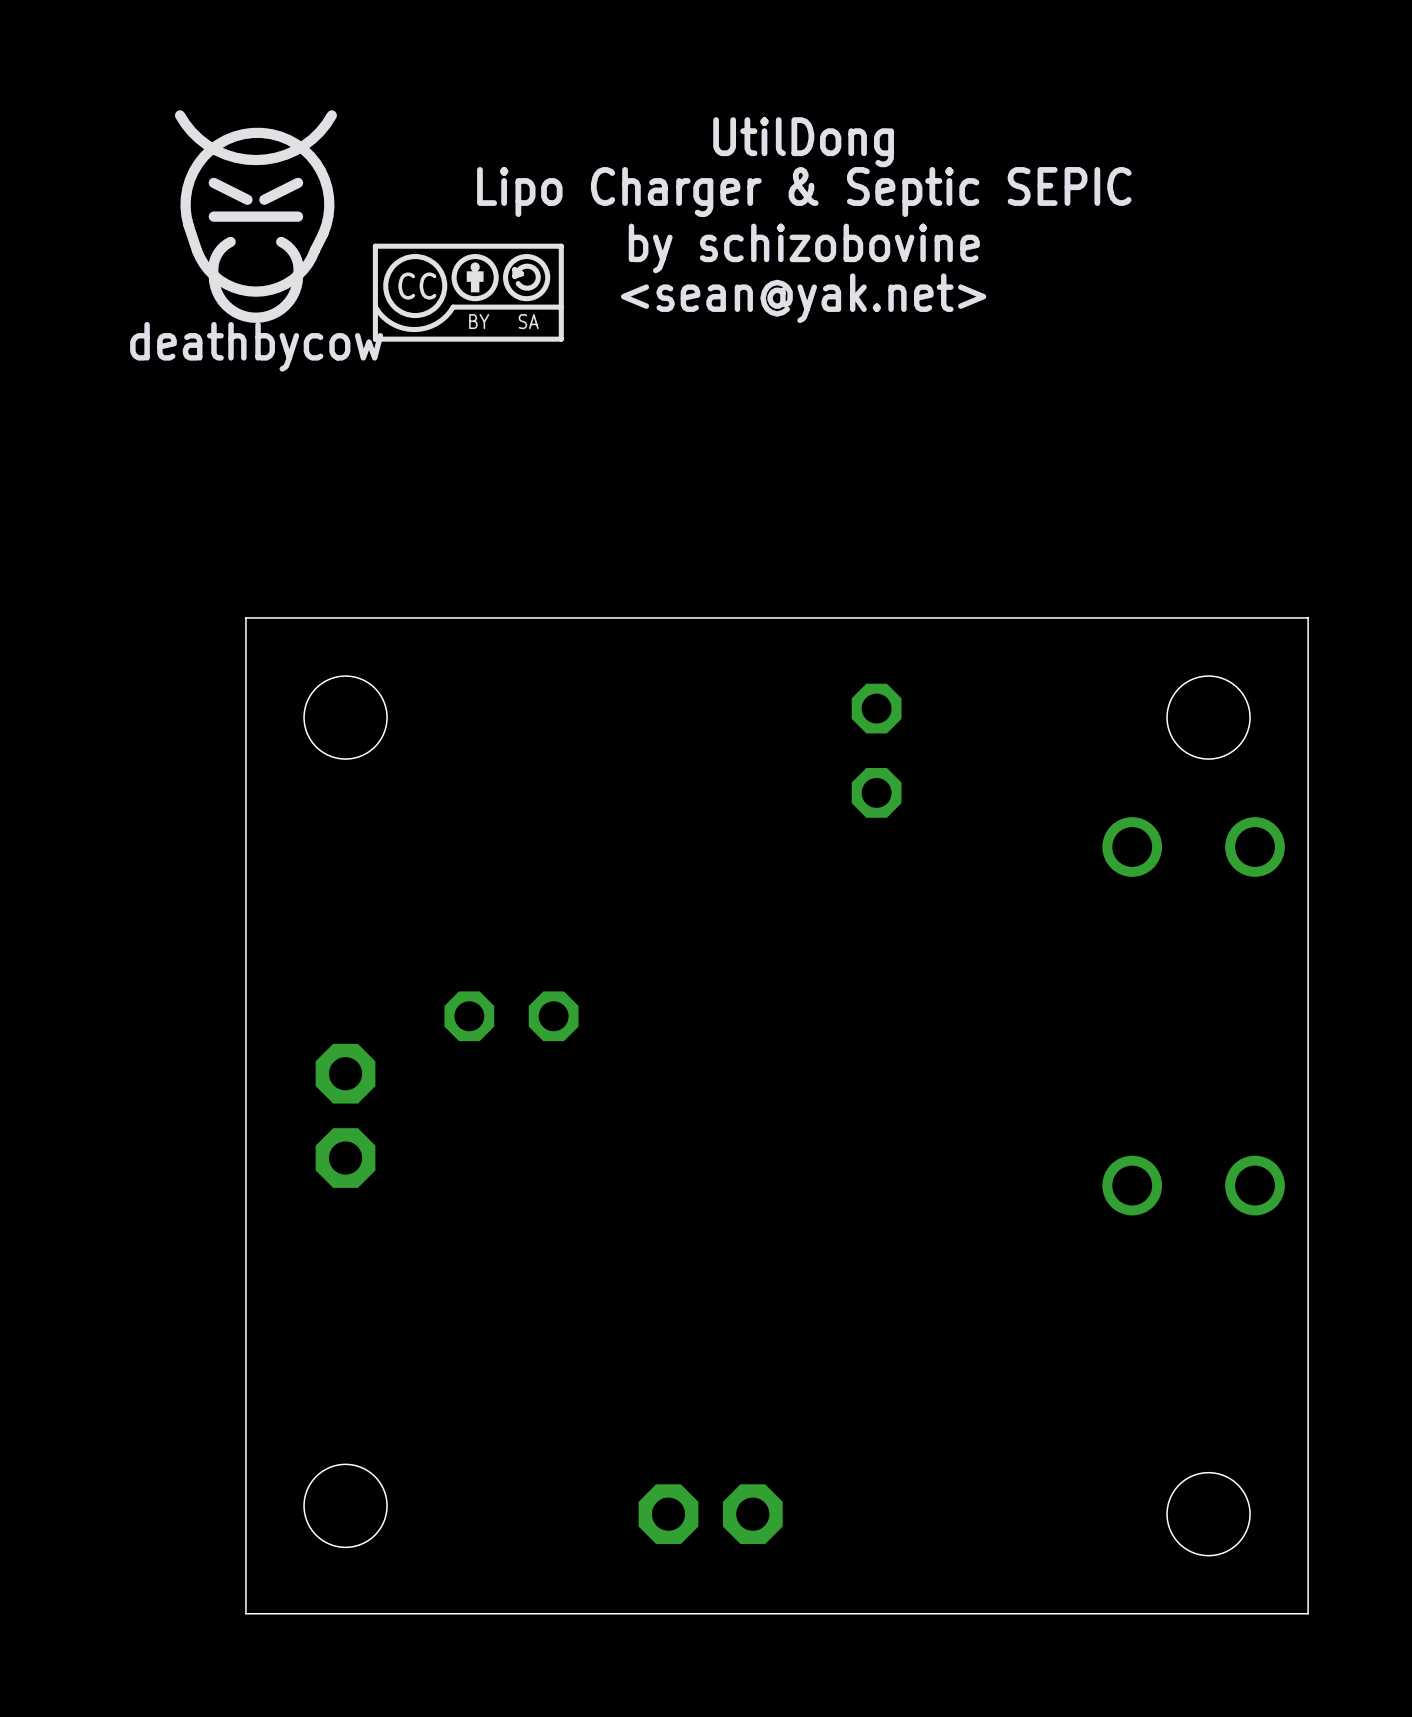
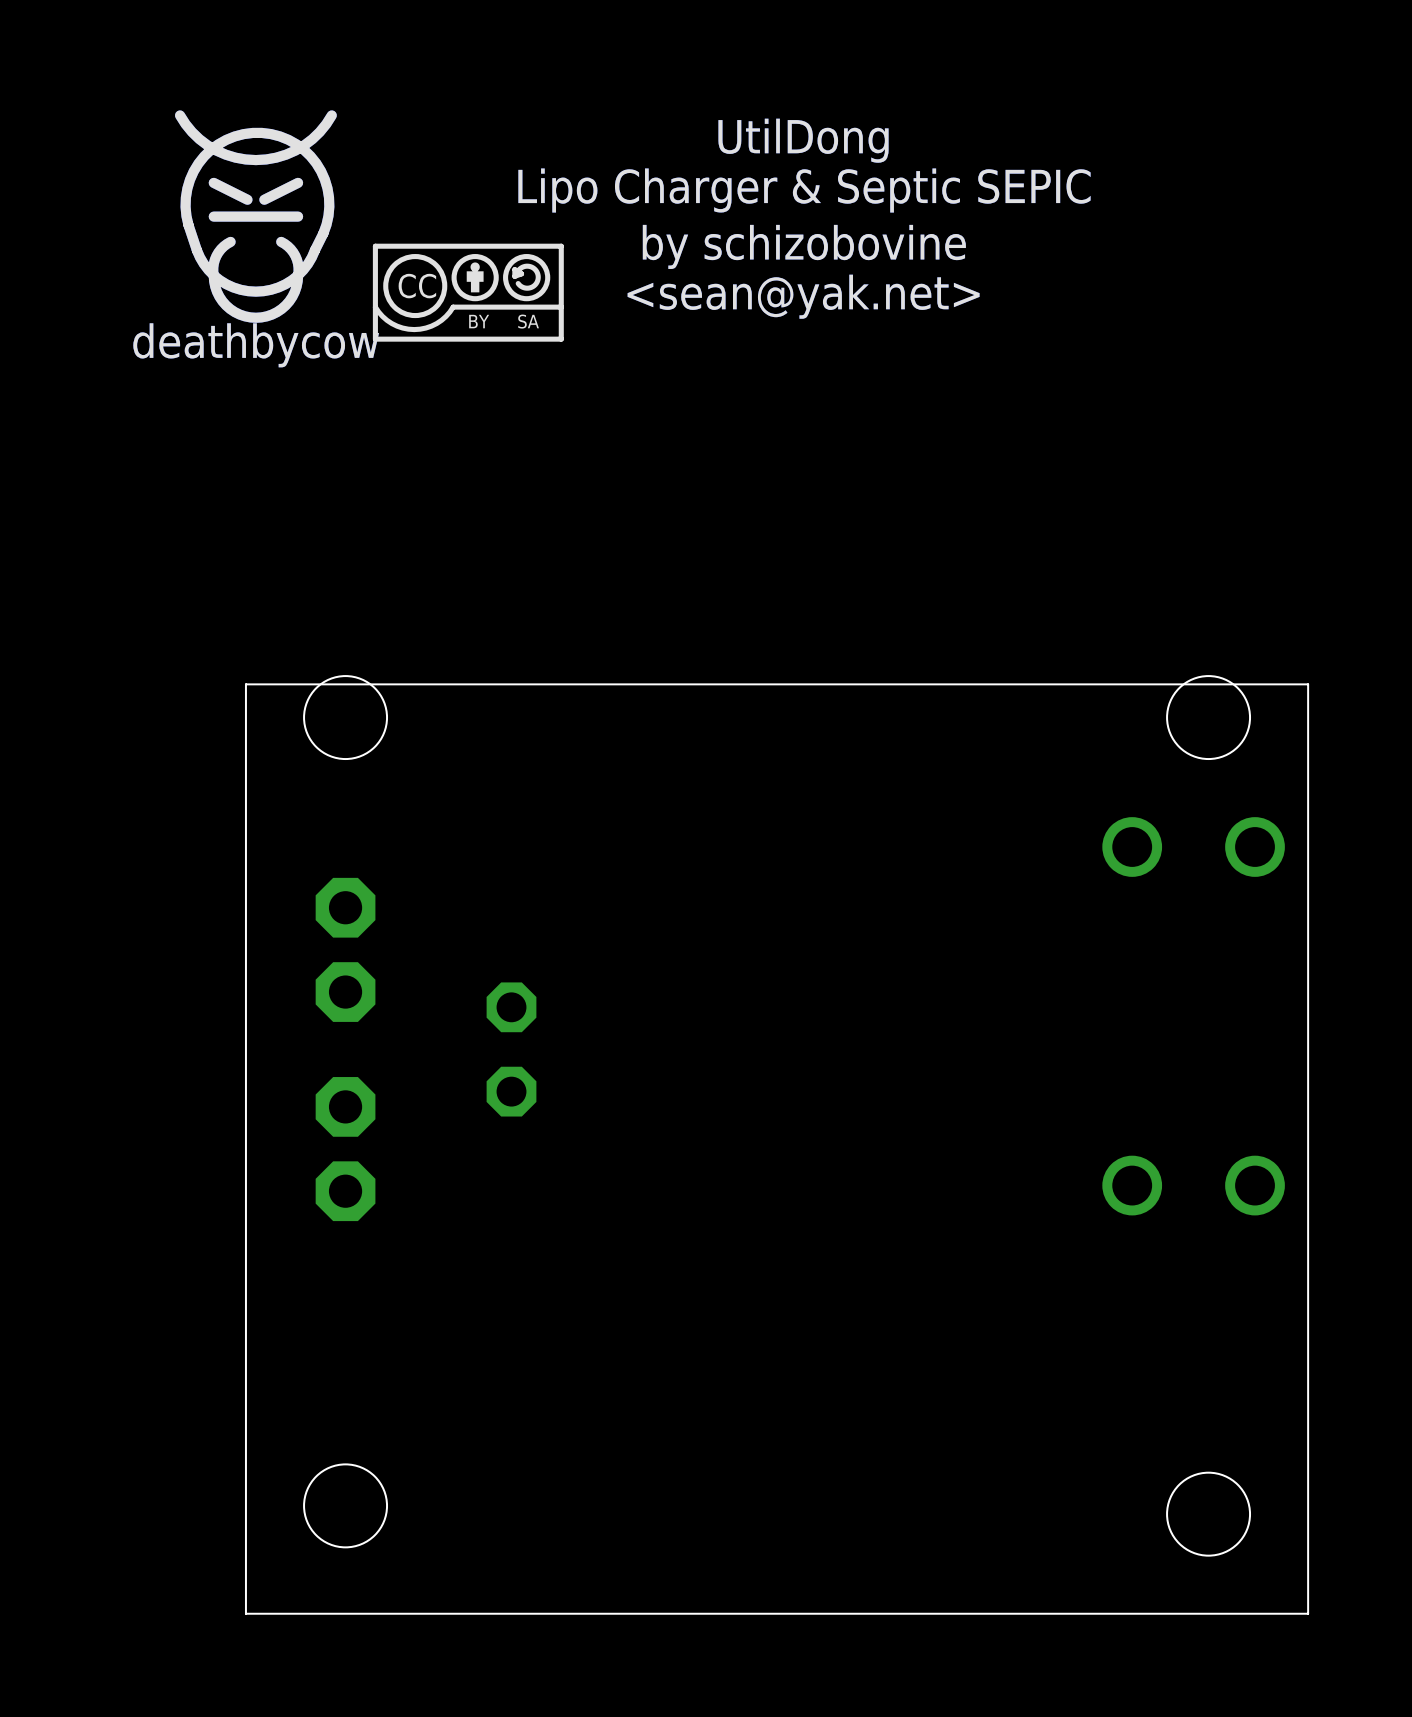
board edge: (1308, 684) (1308, 617) (245, 617) (245, 684) -> (1308, 684) (245, 684)
part: (876, 750) -> none
part rotation: 0° (511, 1016) -> 90° clockwise (511, 1049)
part position: (345, 1115) -> (345, 1149)
part rotation: 0° (710, 1514) -> 90° clockwise (345, 949)
part position: (710, 1514) -> (345, 949)

